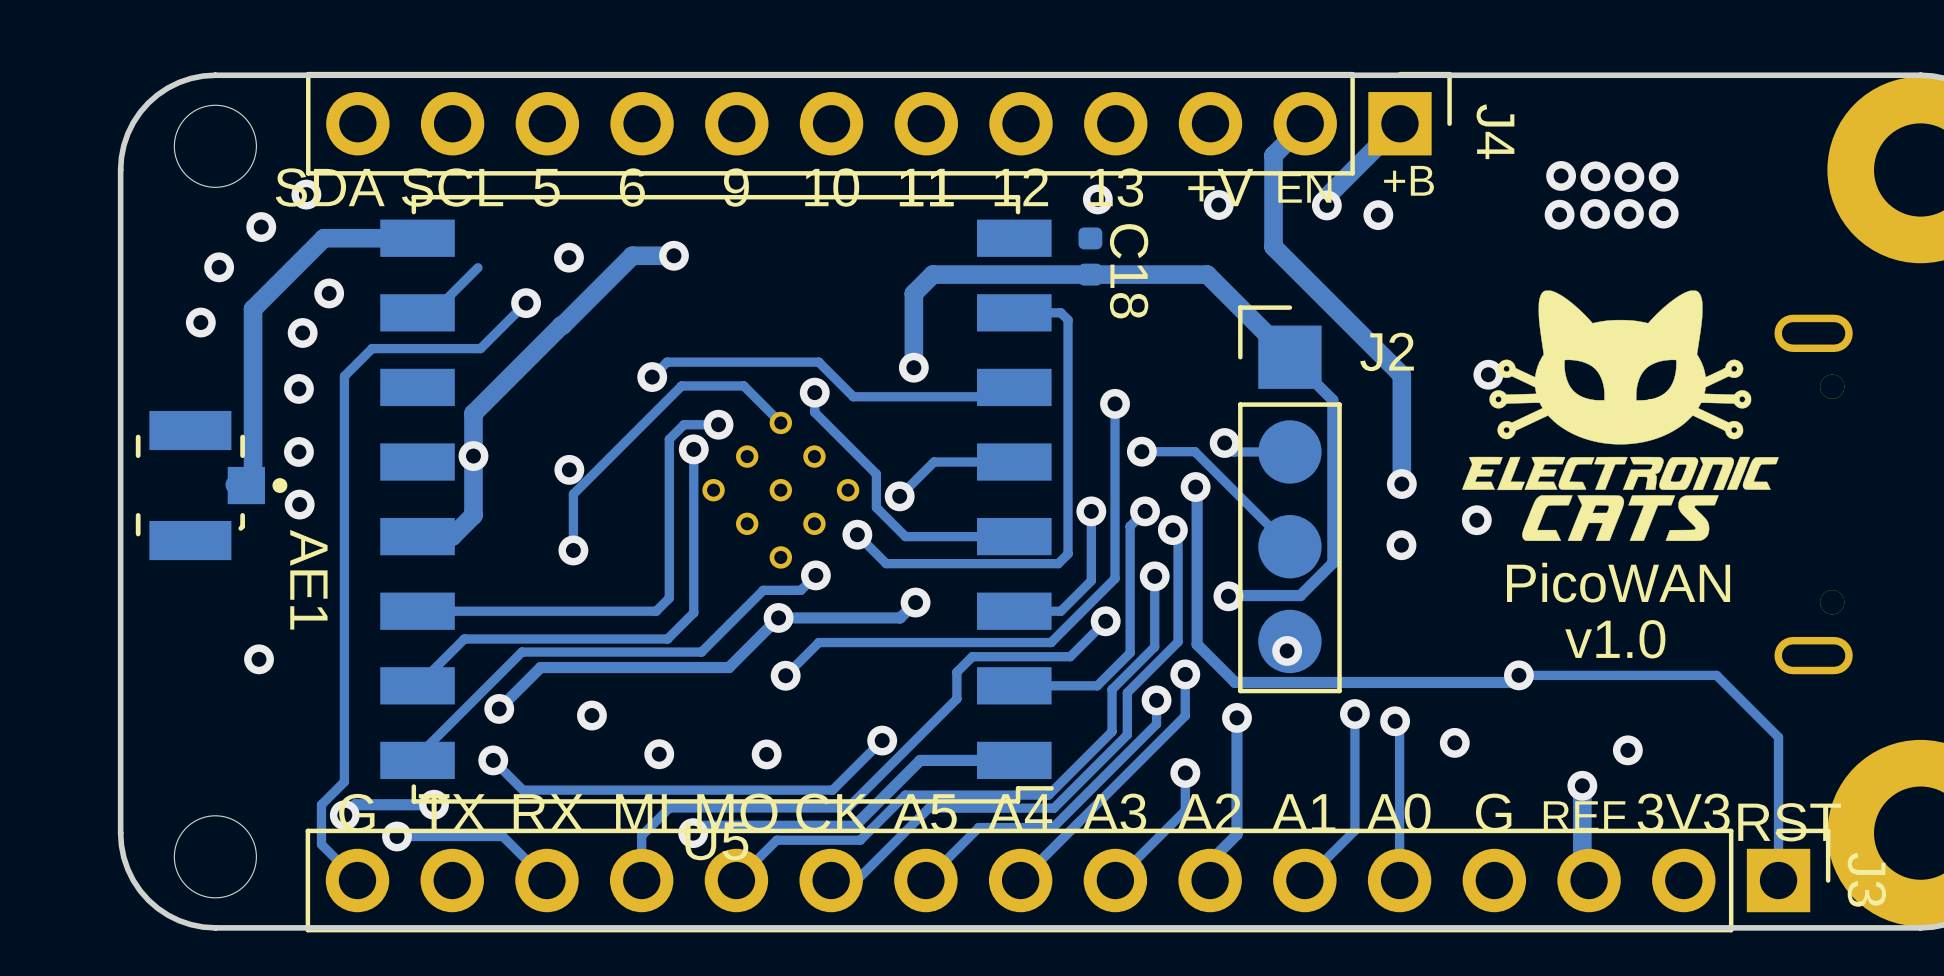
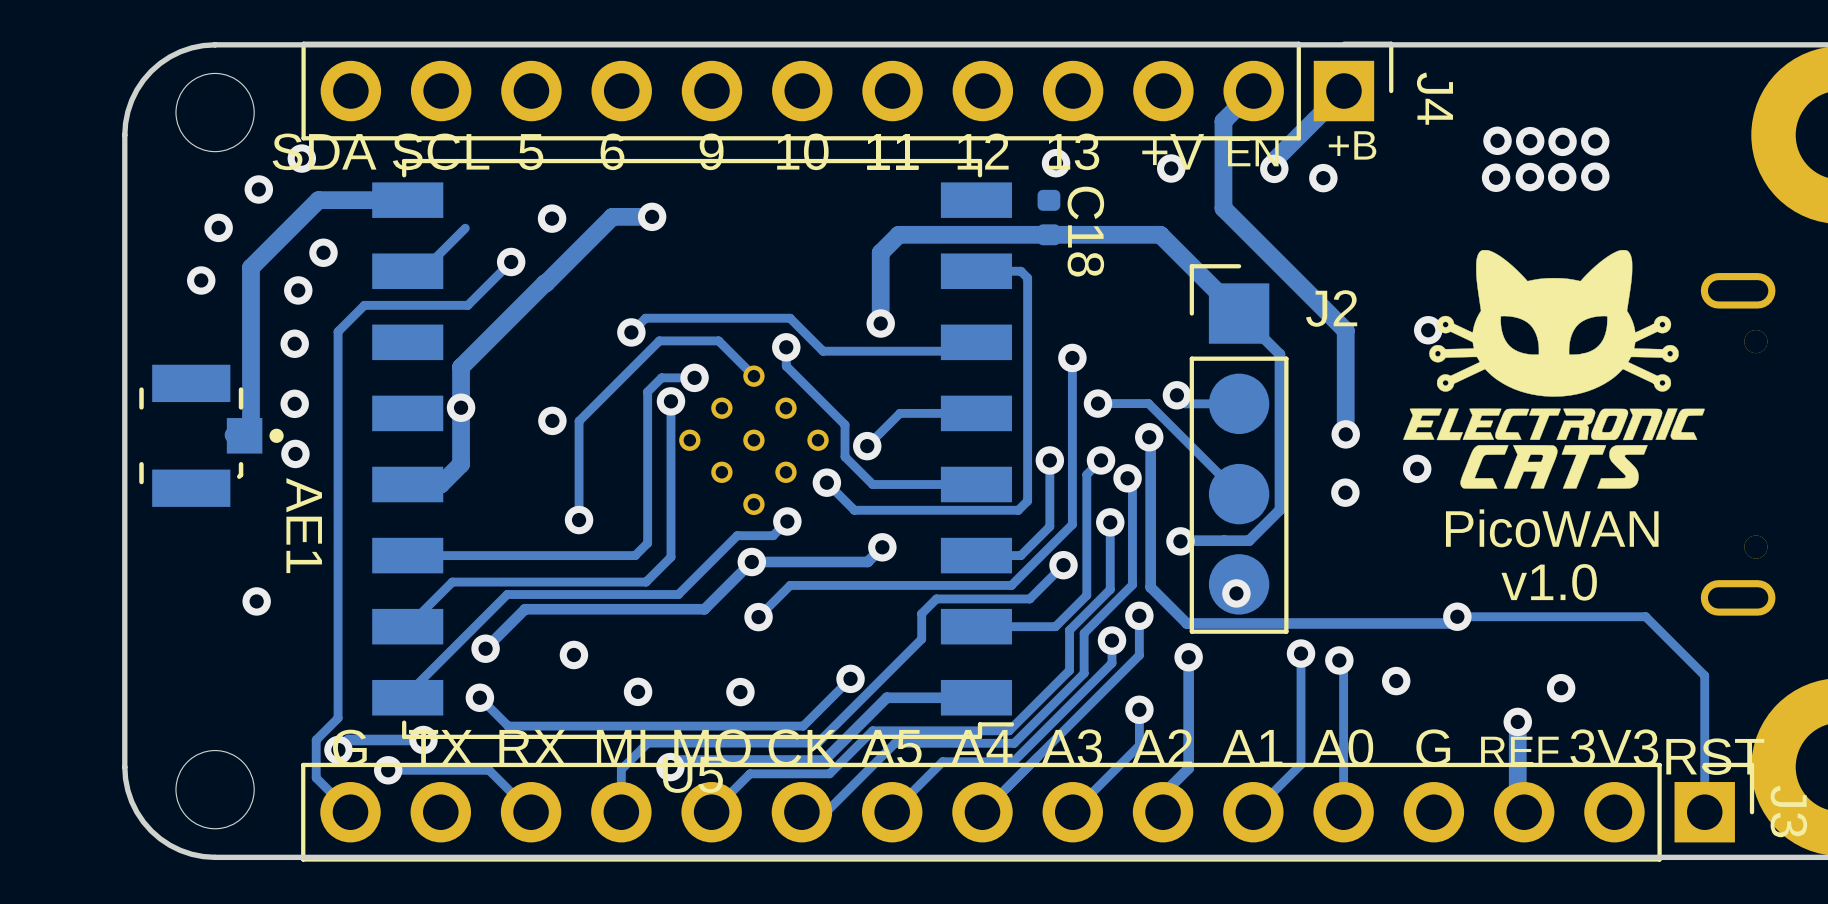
track: (597, 470) (573, 494) (573, 550) -> (579, 421) (579, 520)
via position: (573, 550) -> (579, 520)

